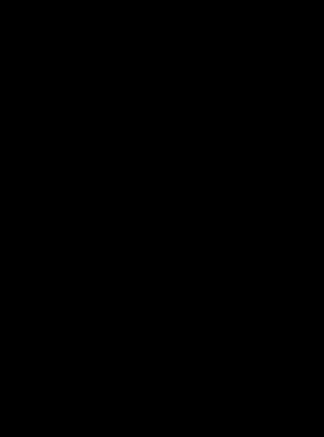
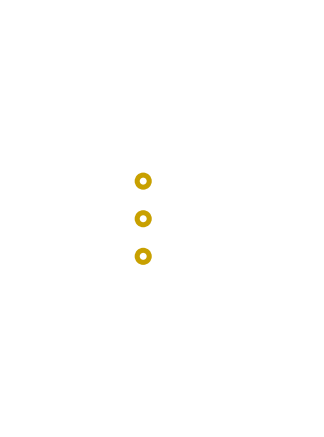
part: none -> (143, 218)

